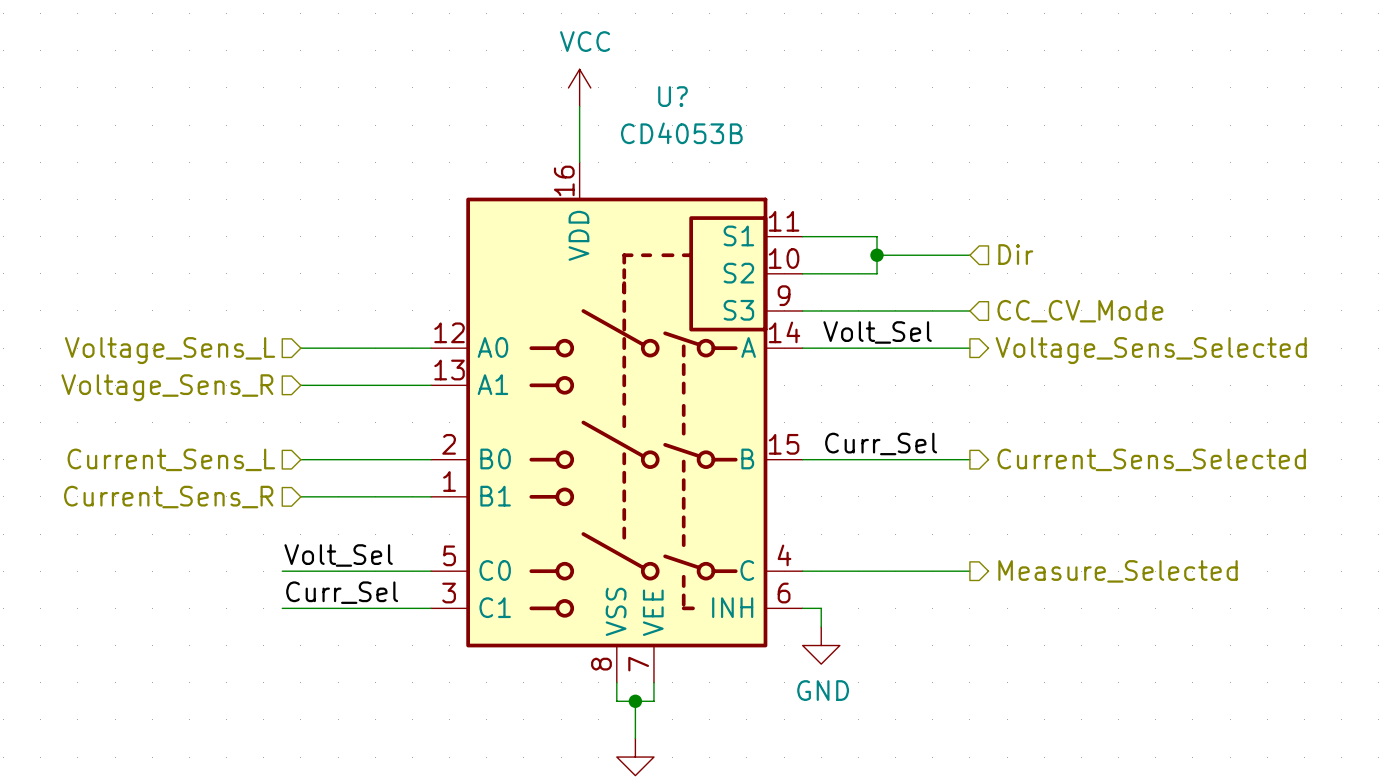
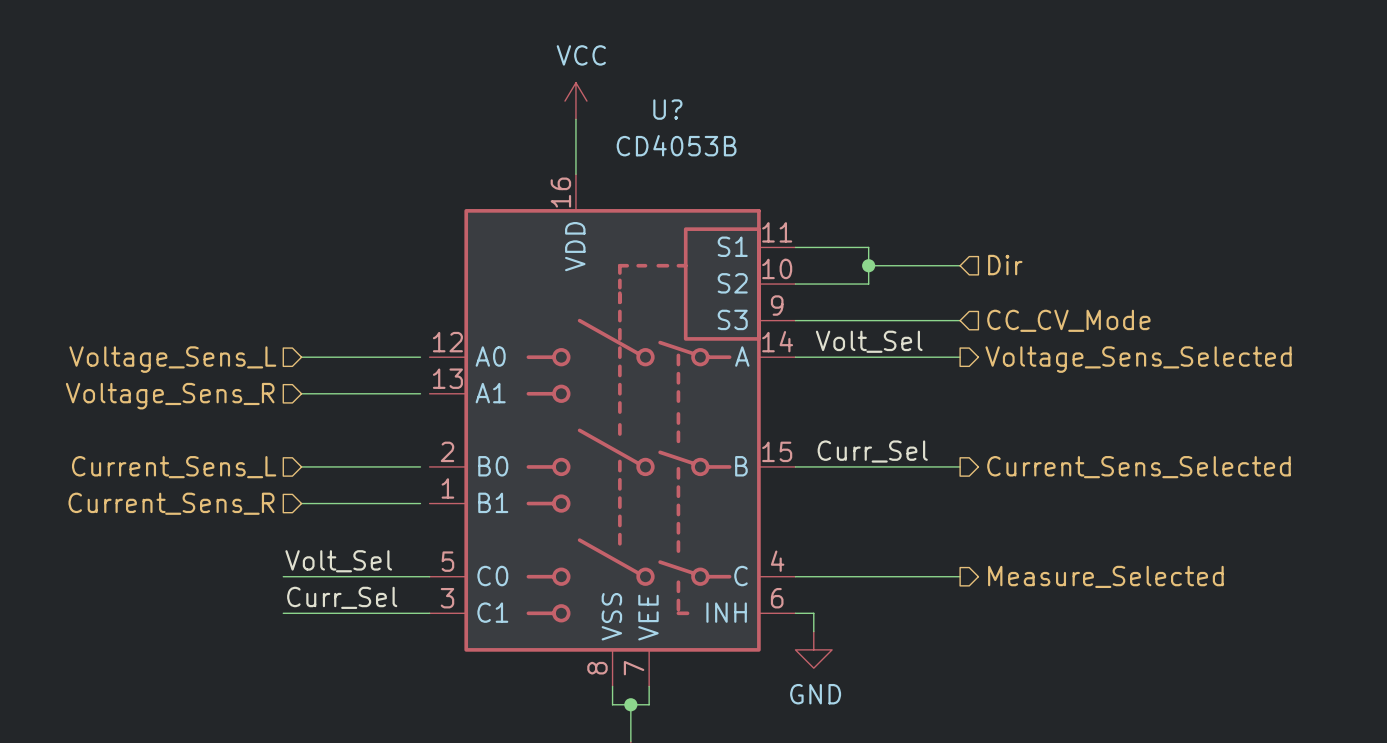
wire: (421, 348) (430, 348) -> none
wire: (421, 385) (430, 385) -> none
wire: (421, 459) (430, 459) -> none
wire: (421, 496) (430, 496) -> none

